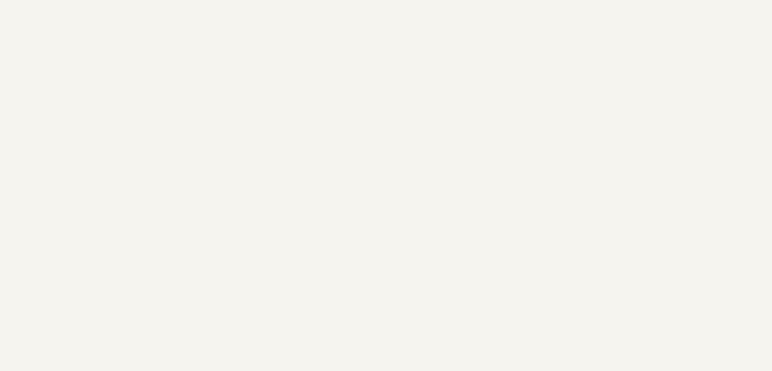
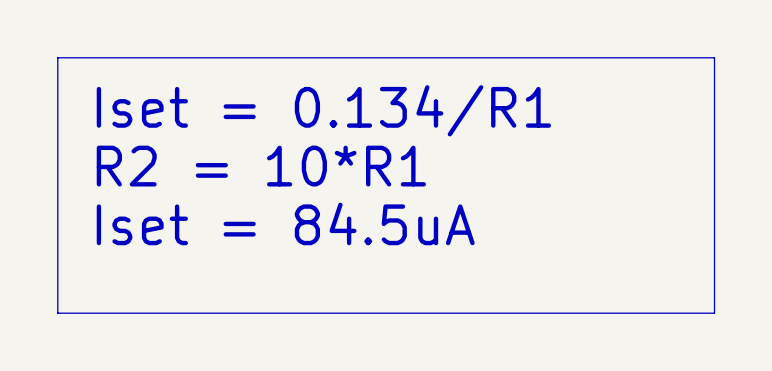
line: none -> (57, 57) (714, 57) (714, 313) (57, 313) (57, 57)
text: none -> Iset = 0.134/R1 (323, 110)
text: none -> R2 = 10*R1 (261, 166)
text: none -> Iset = 84.5uA (285, 223)

